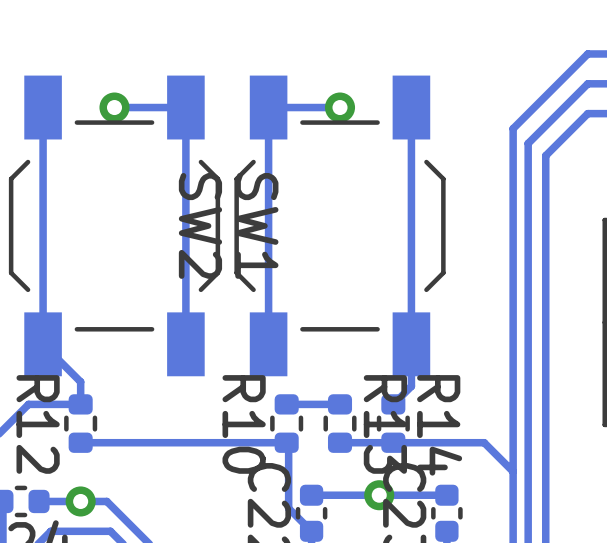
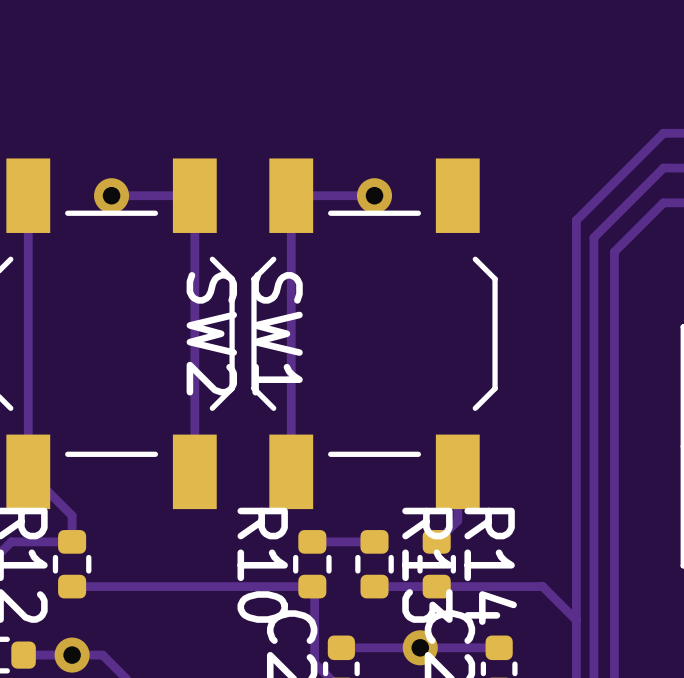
track: (411, 107) (411, 344) -> none

